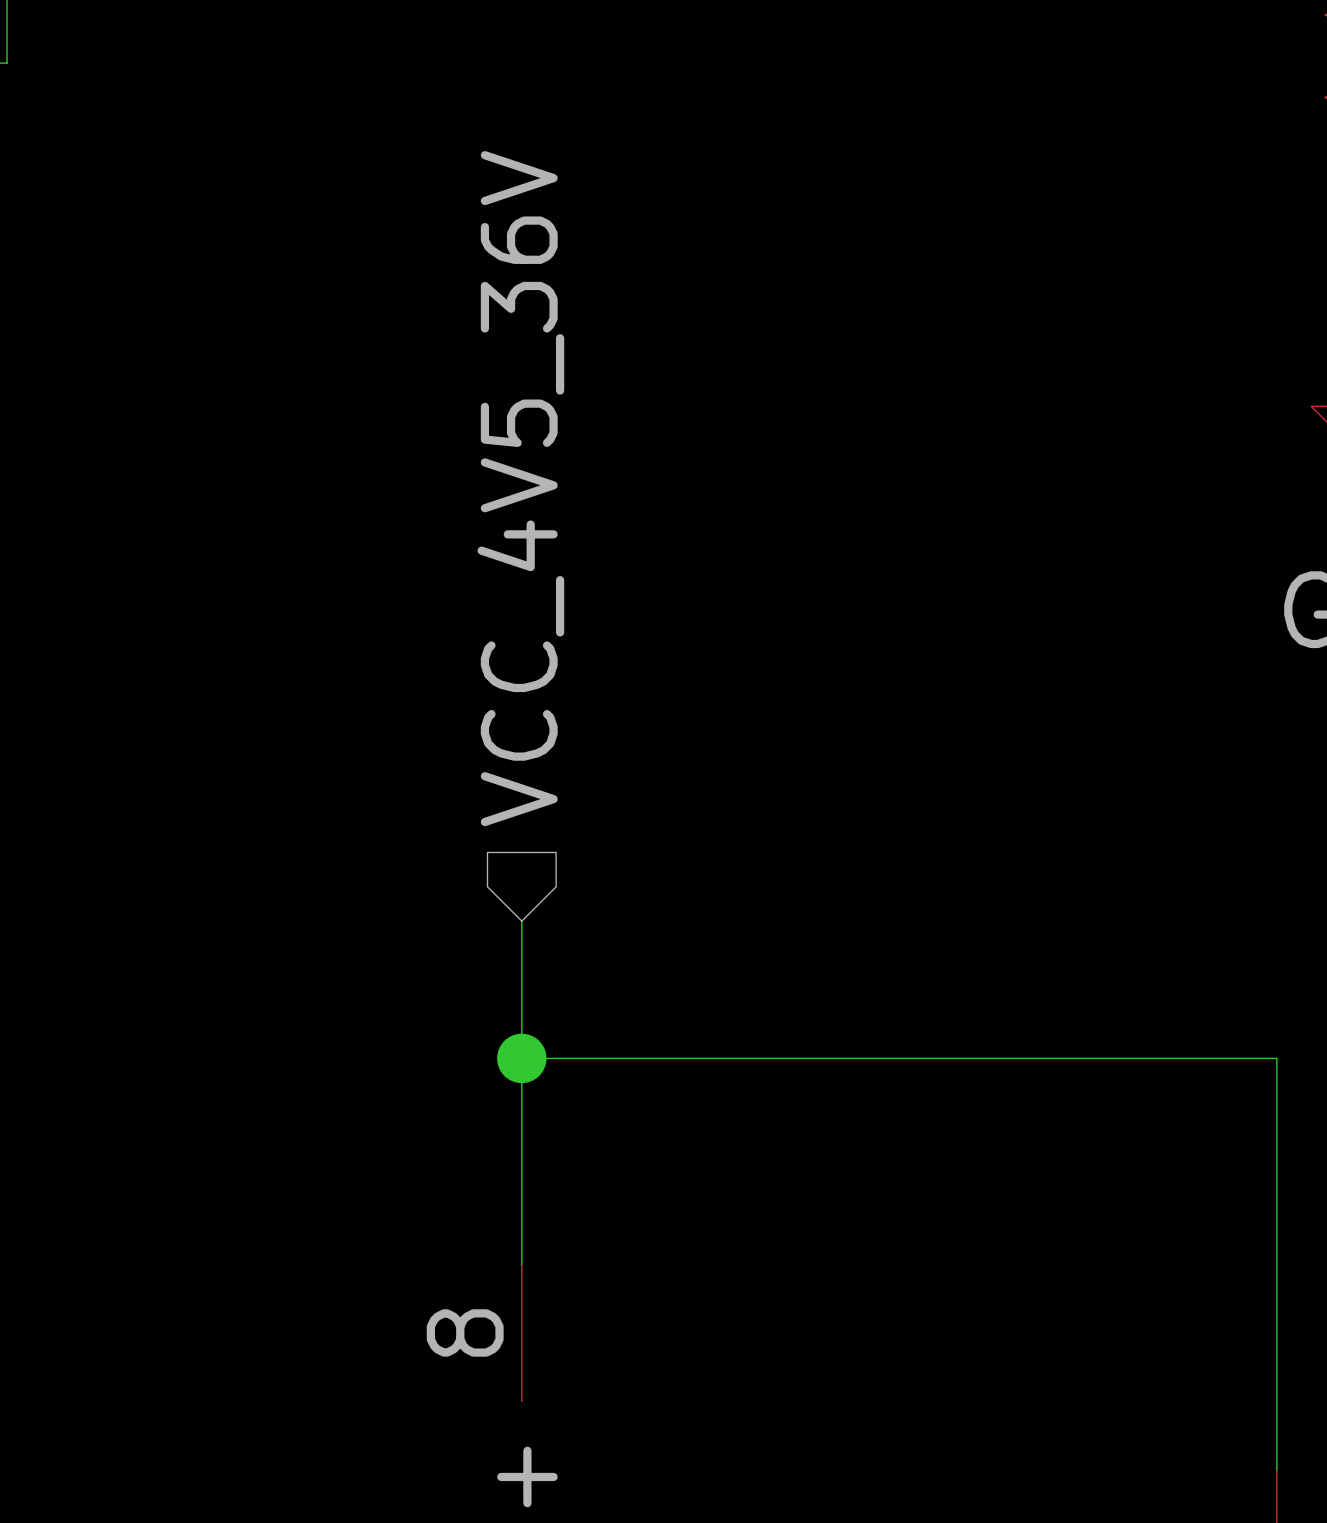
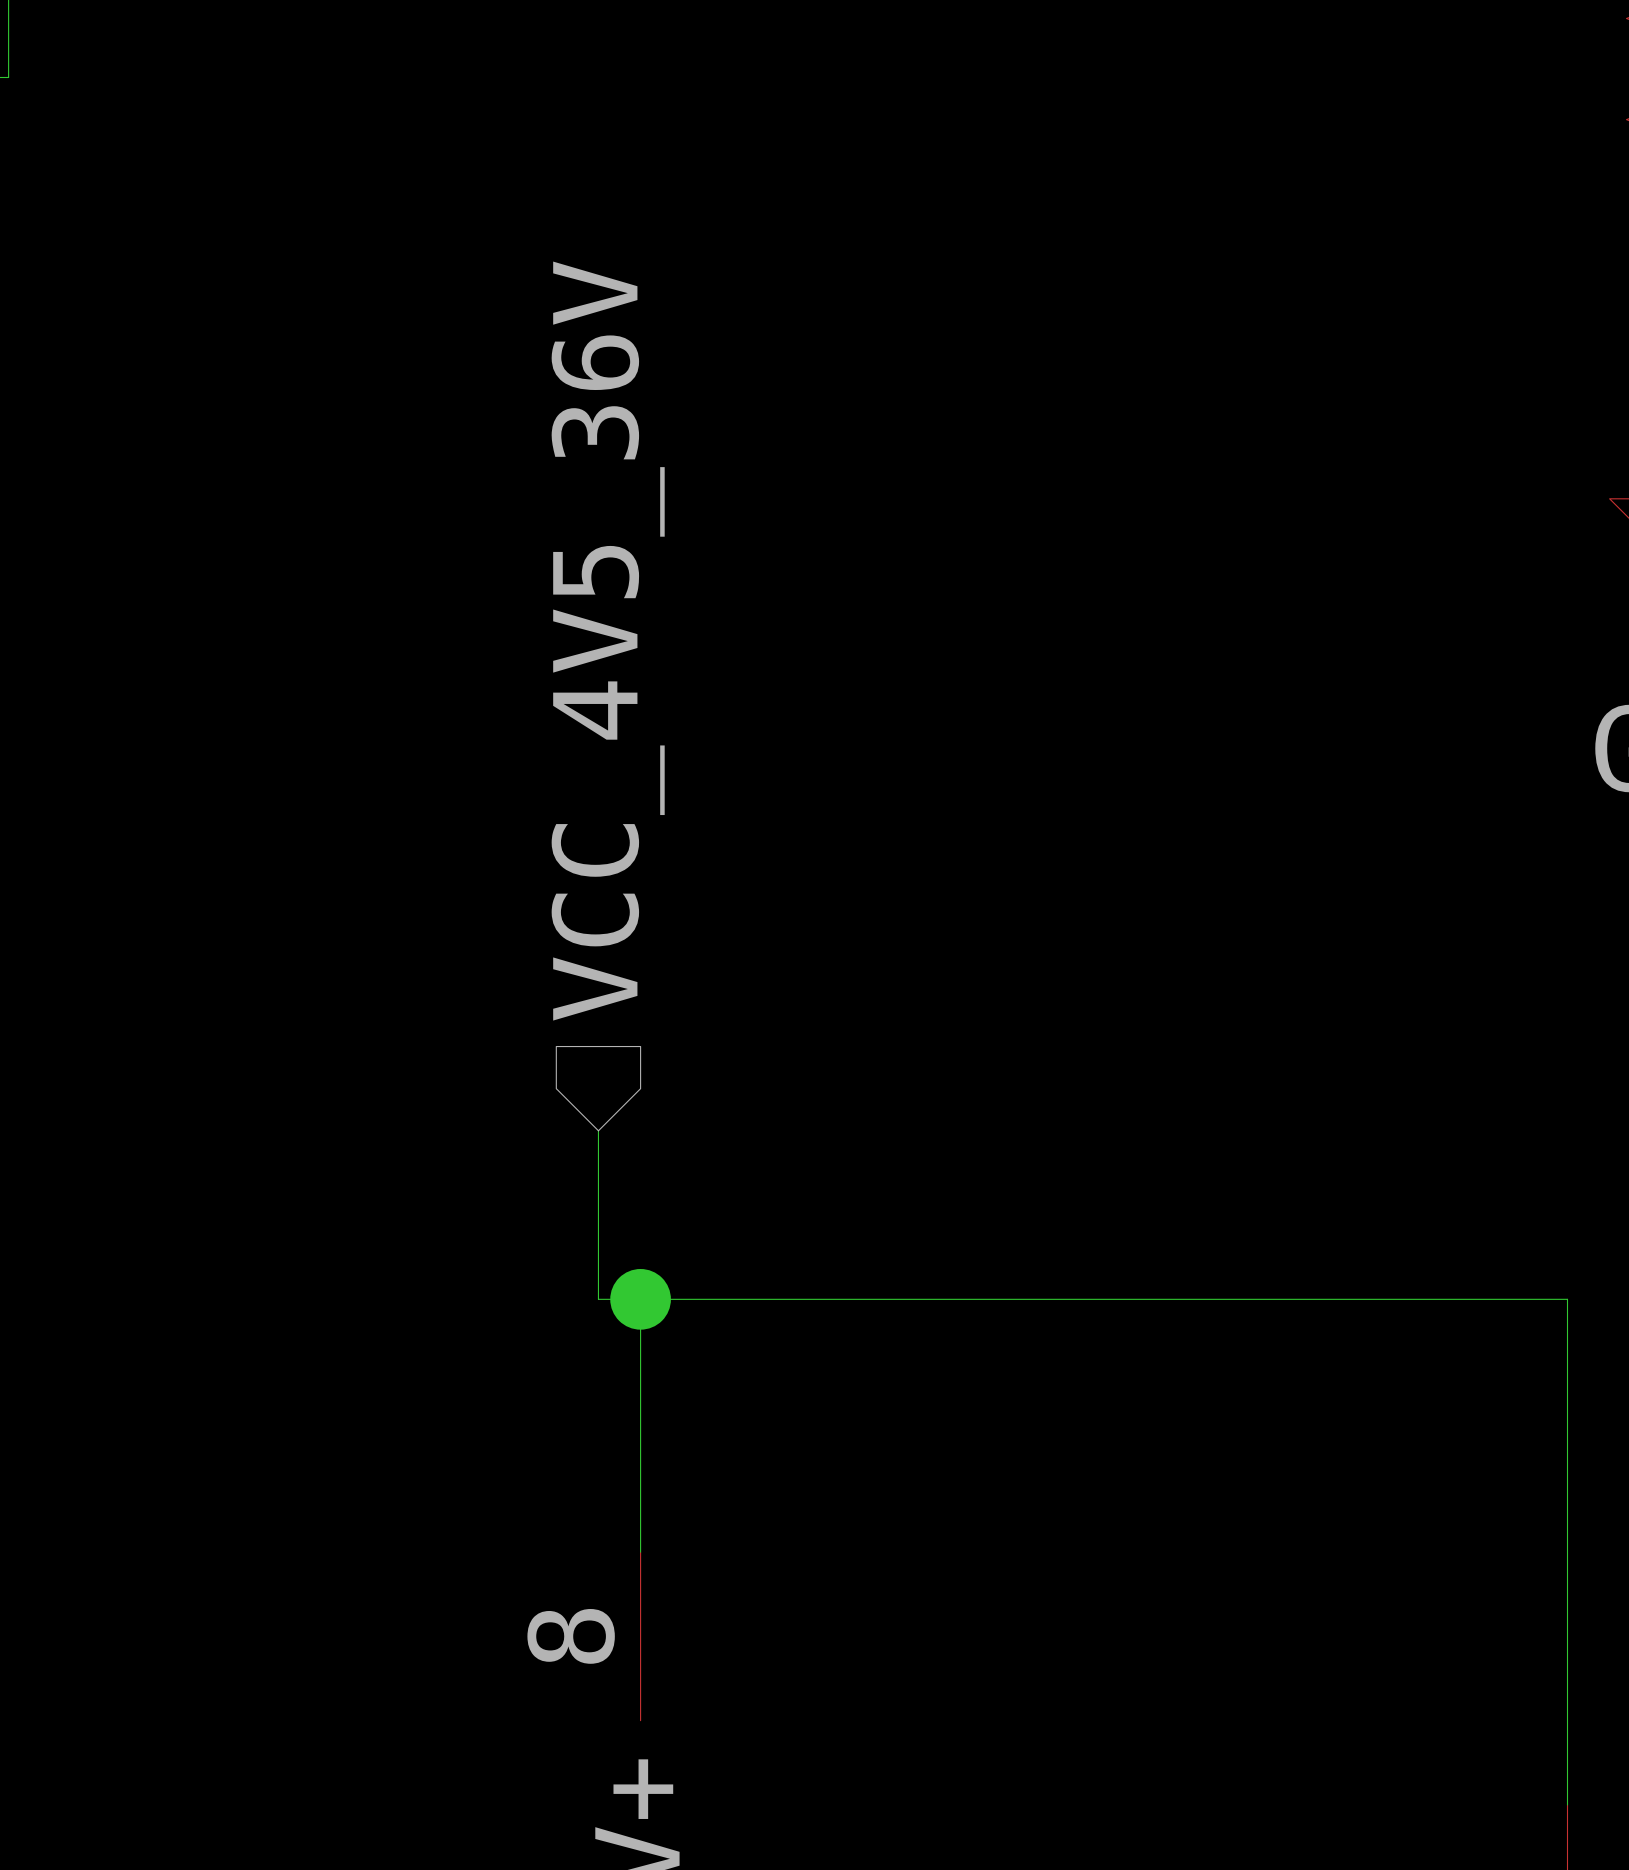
hierarchical label position: VCC_4V5_36V (520, 488) -> VCC_4V5_36V (608, 641)
wire: (521, 921) (521, 1058) -> (598, 1130) (598, 1299) (640, 1299)

